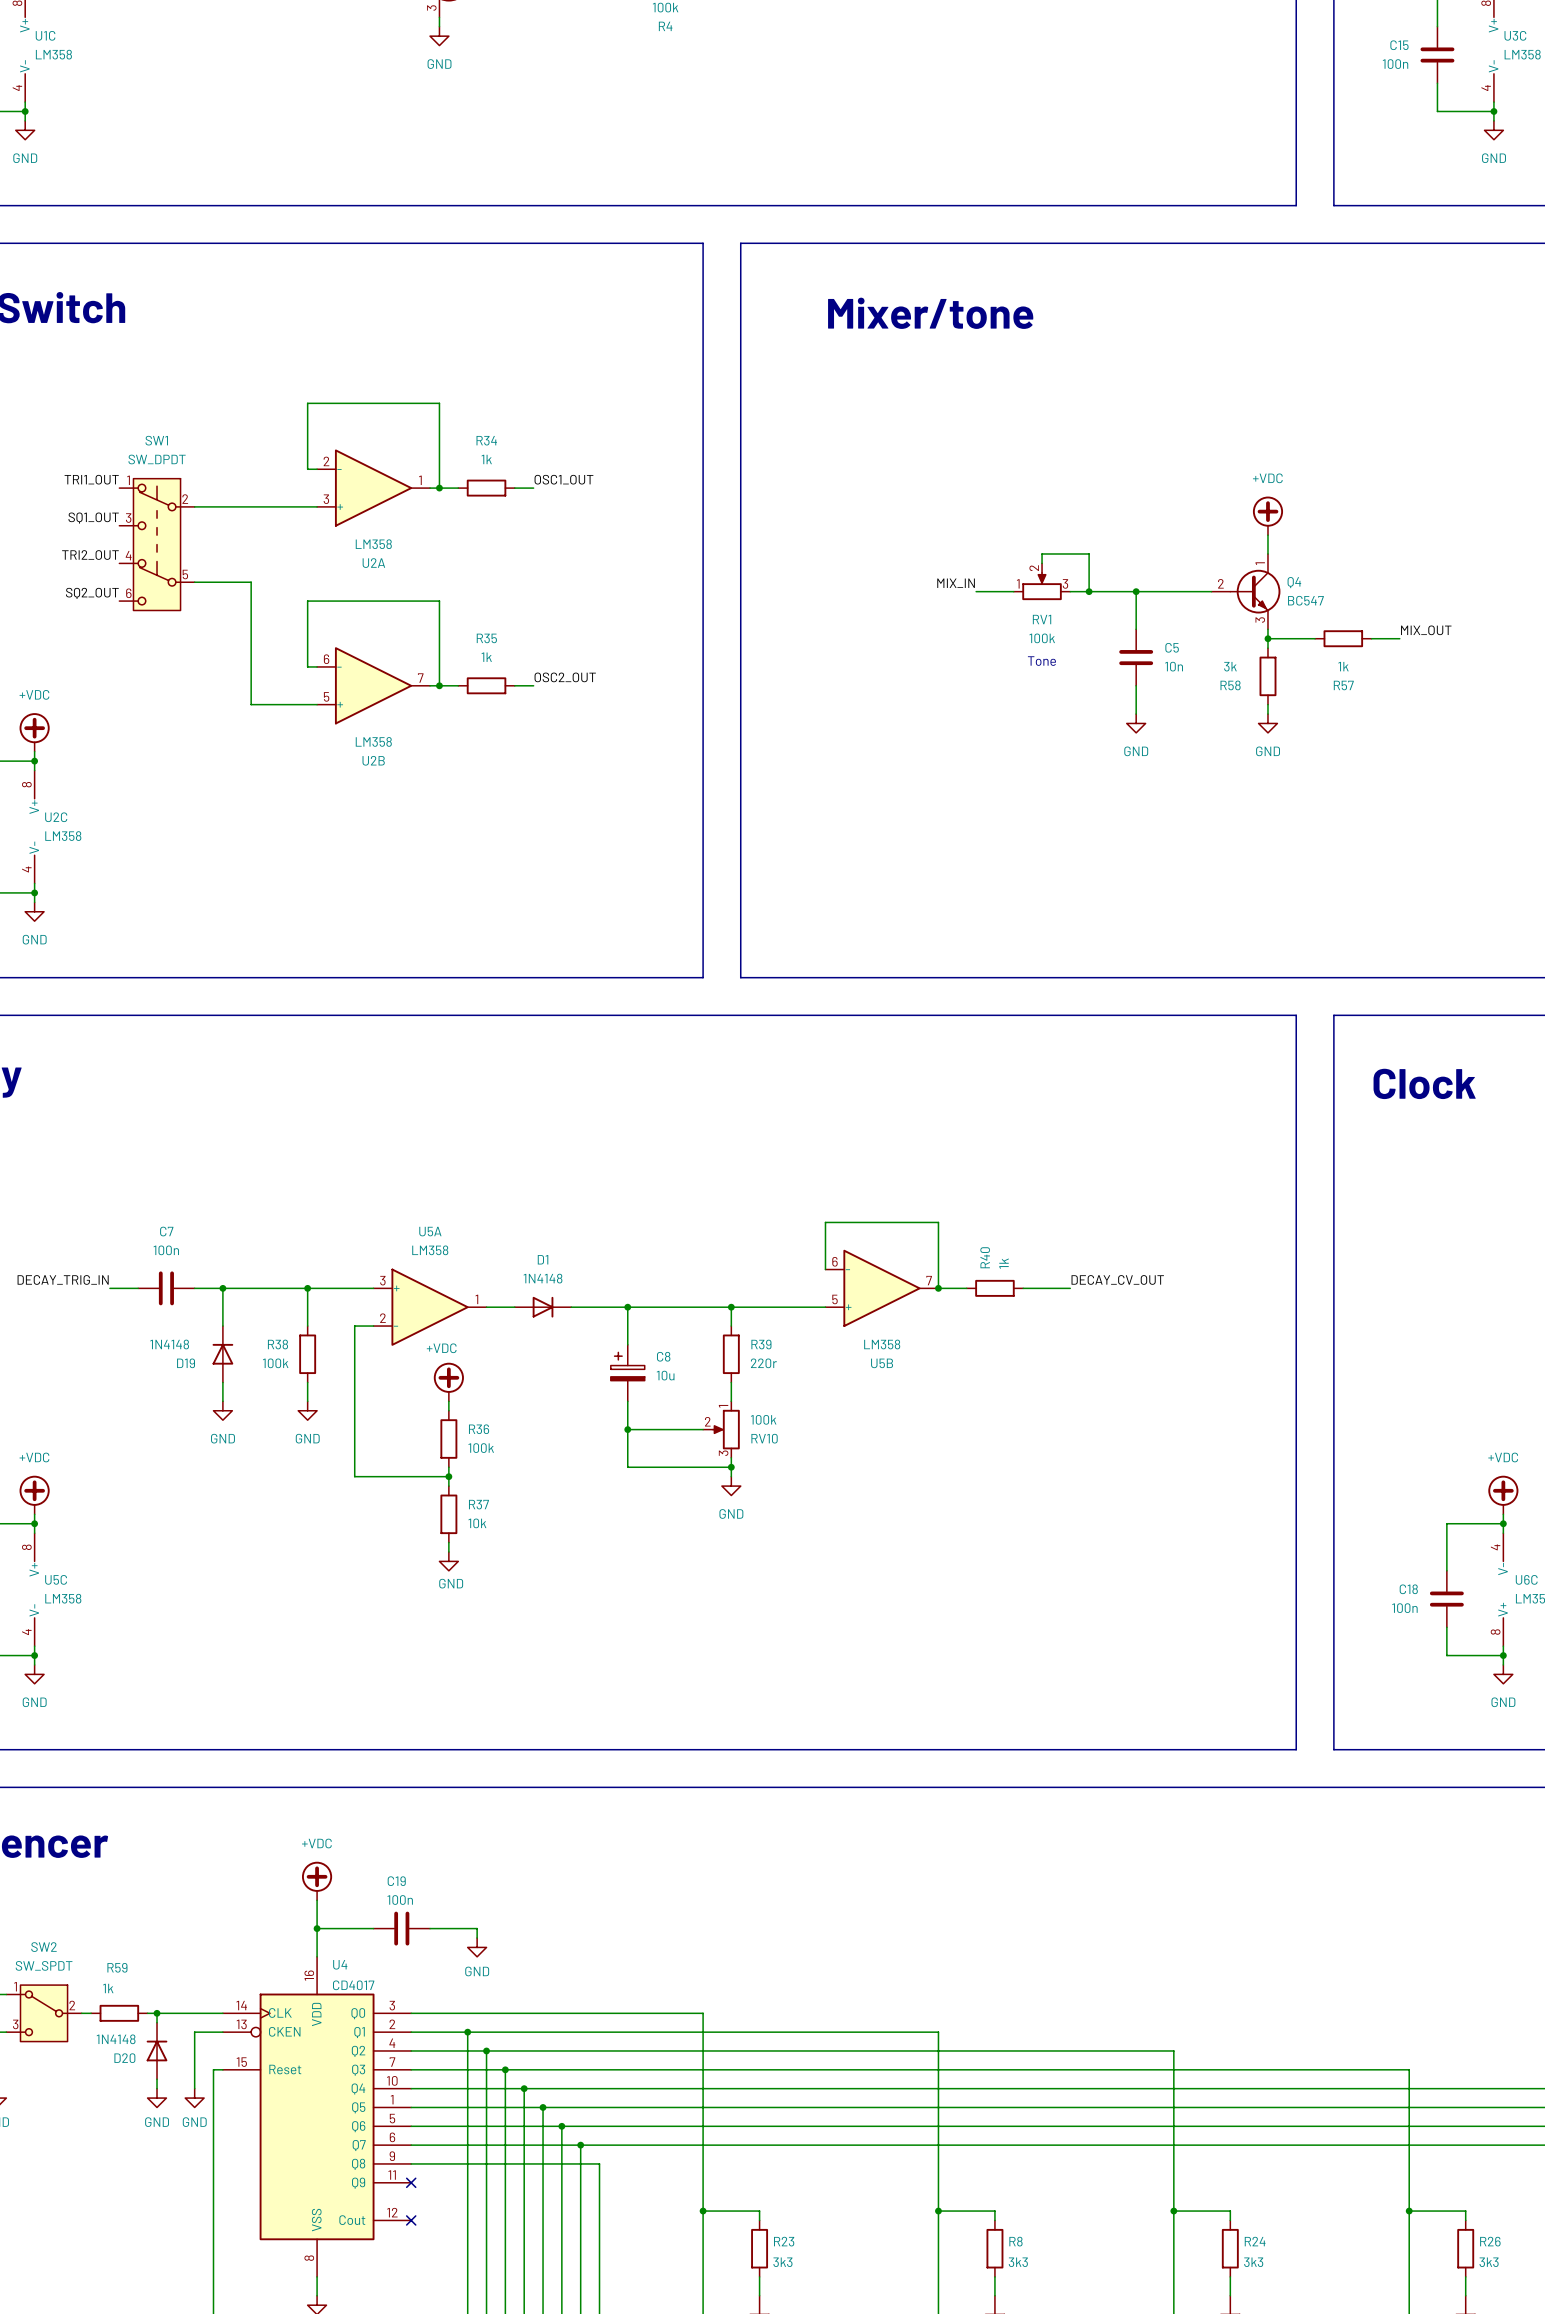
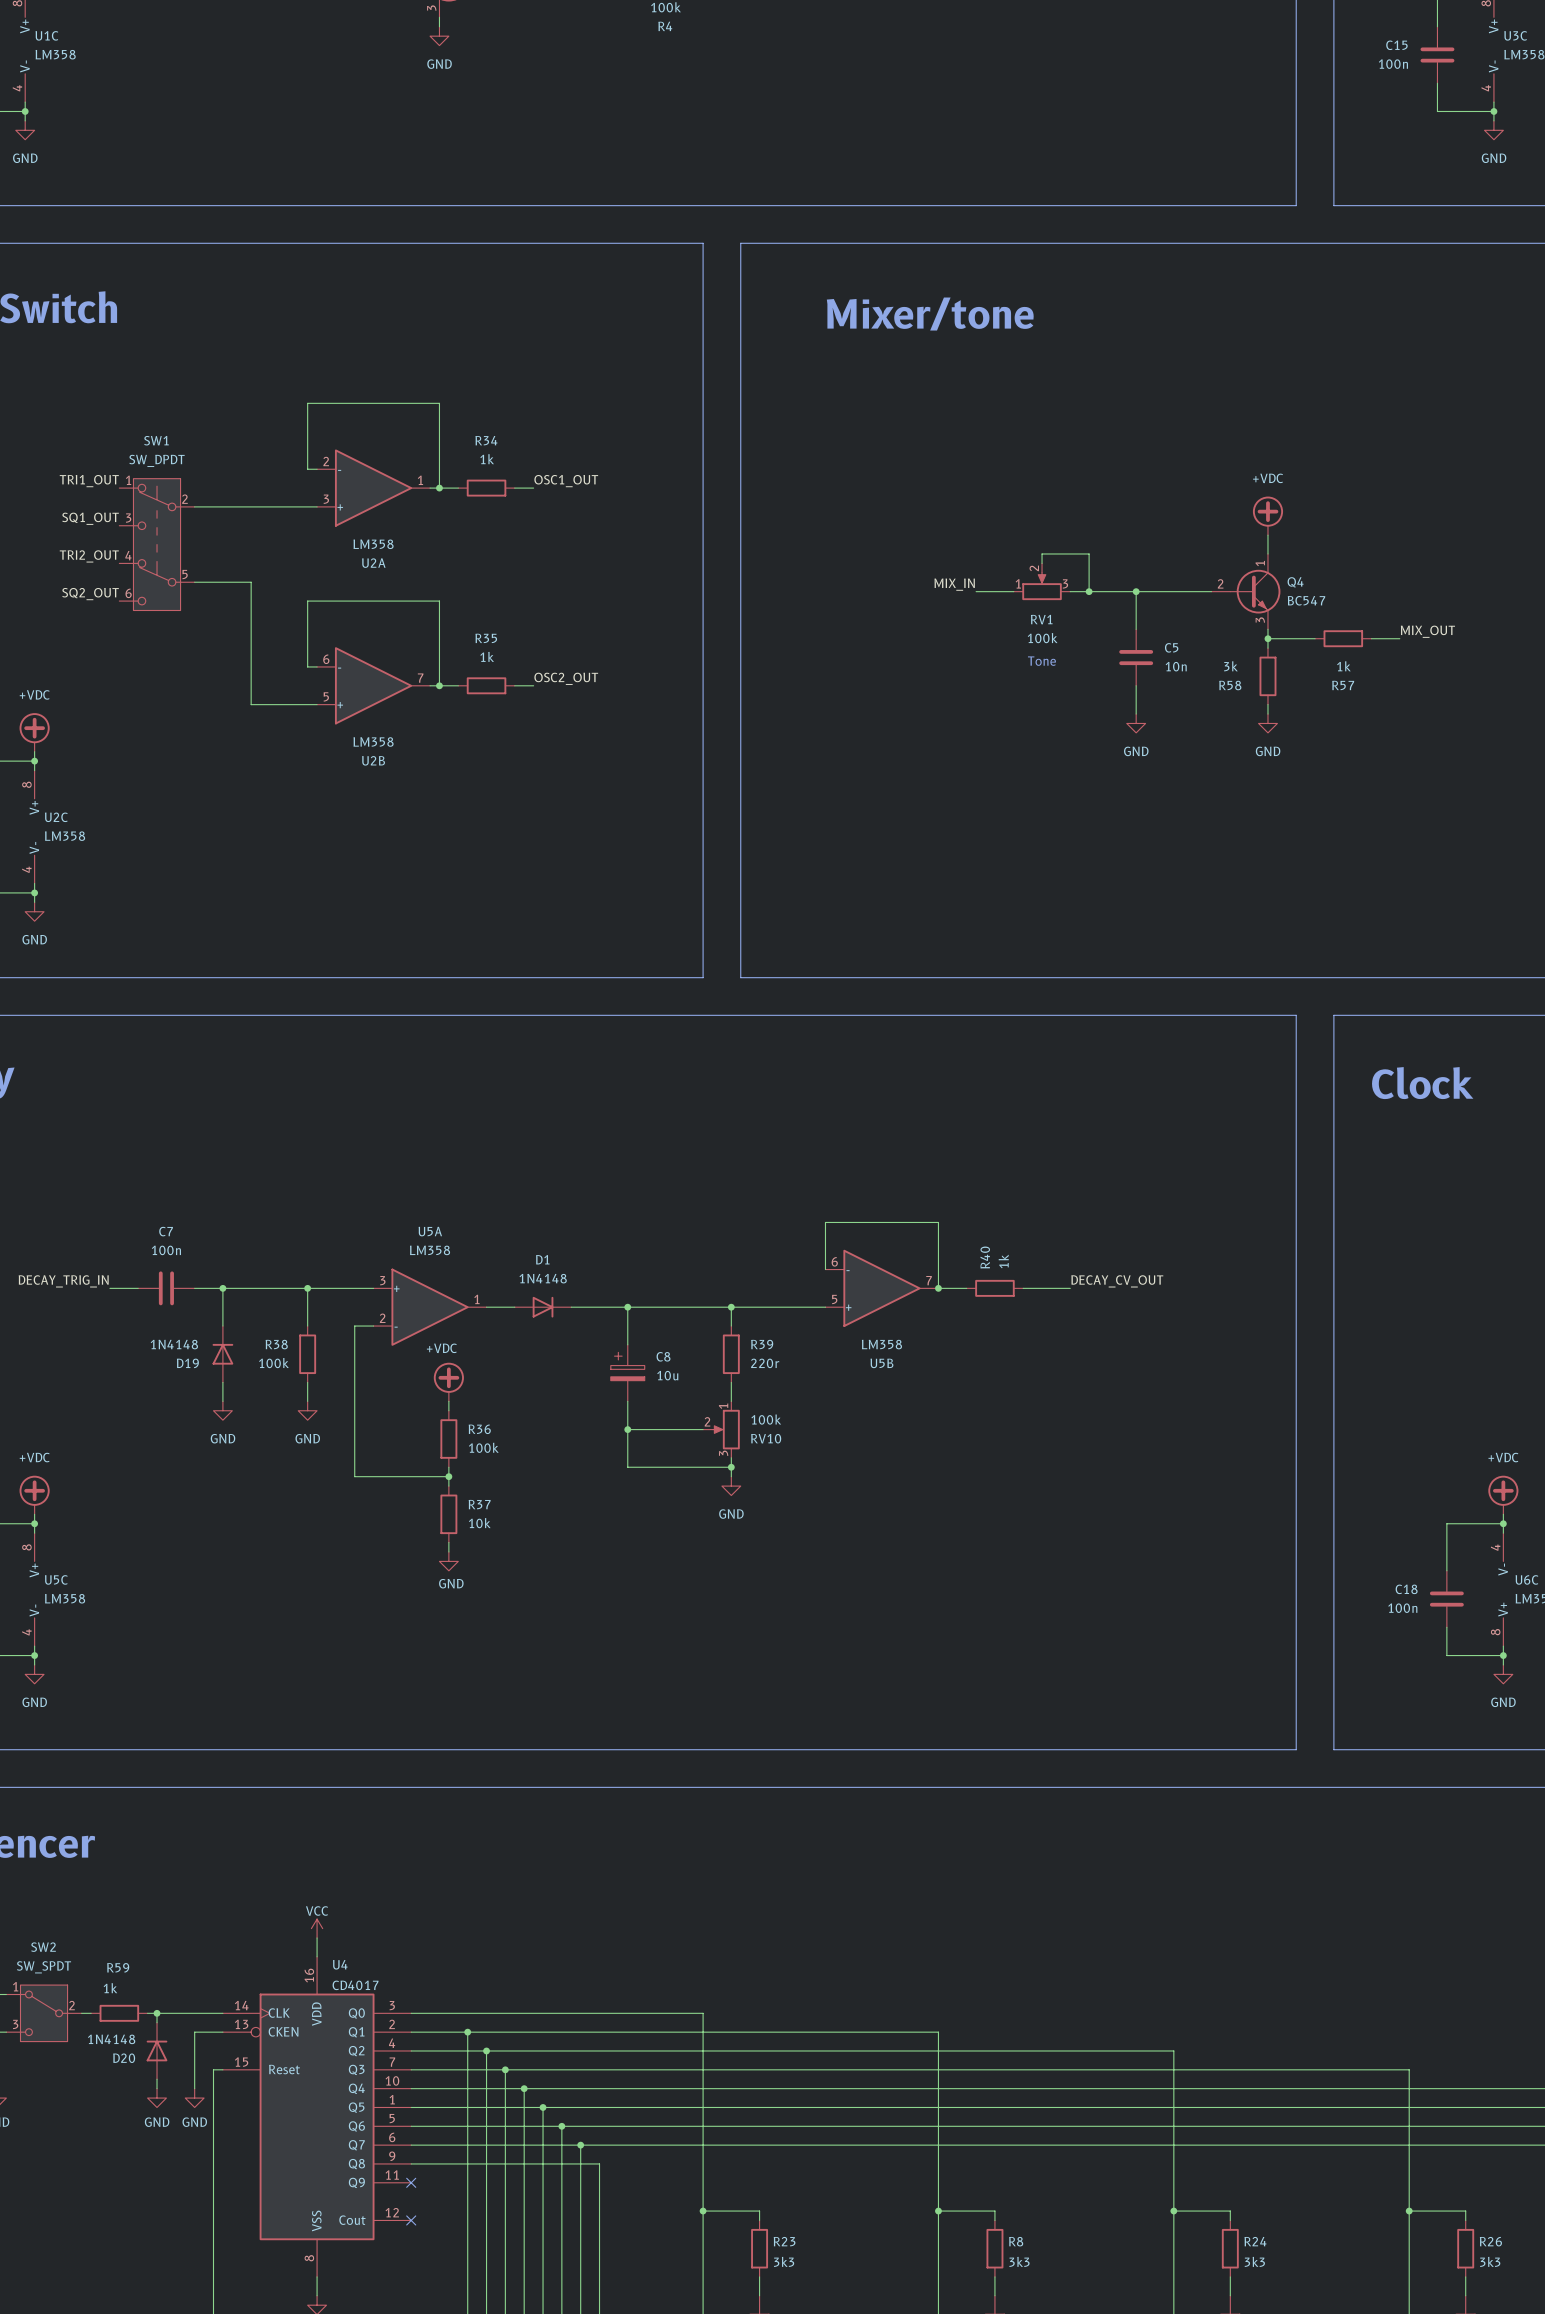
power symbol: +VDC (317, 1881) -> none
wire: (317, 1928) (373, 1928) -> none
junction: (317, 1928) -> none
power symbol: none -> VCC (317, 1928)
C19: 100n (401, 1928) -> none
wire: (430, 1928) (477, 1928) (477, 1938) -> none
power symbol: GND (477, 1947) -> none

